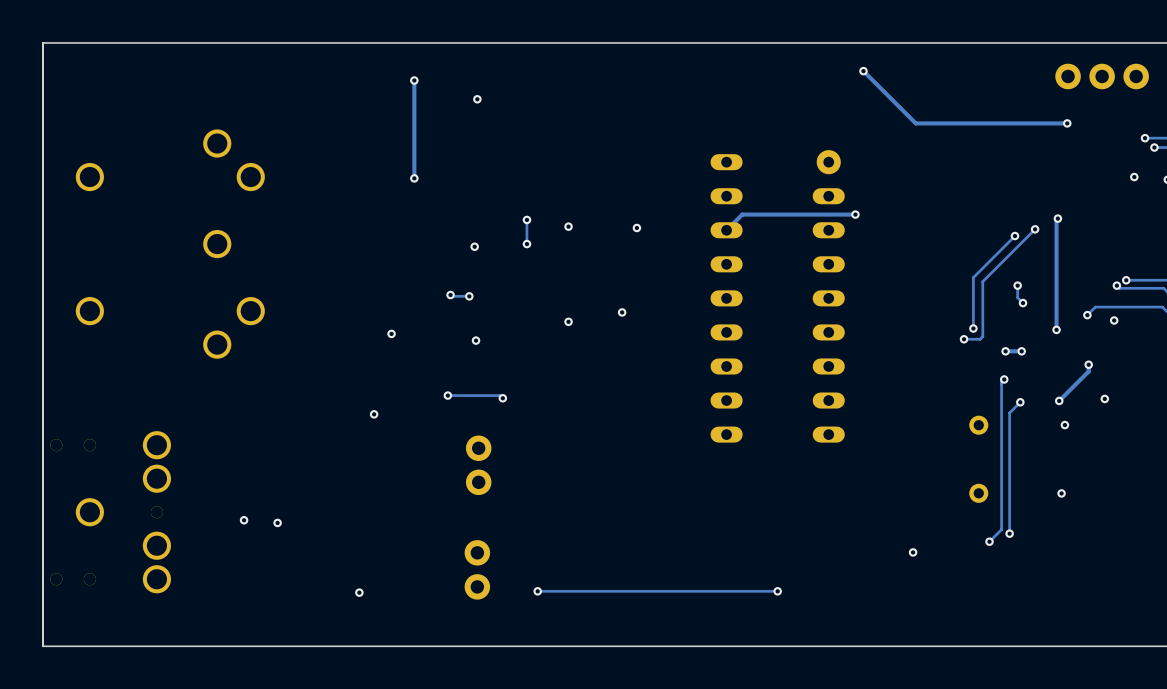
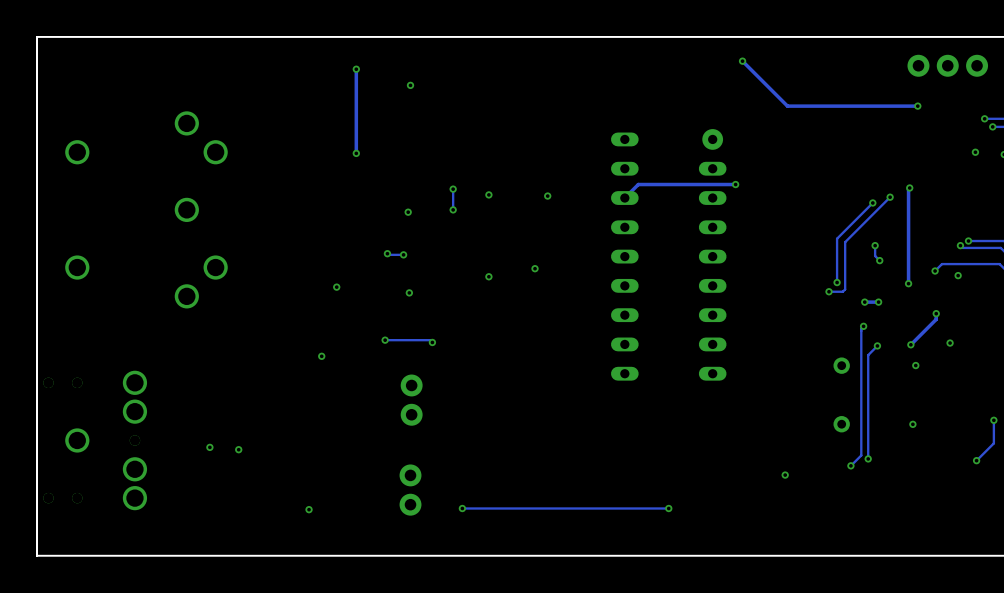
track: none -> (993, 420) (993, 443) (976, 460)
via: none -> (993, 420)
via: none -> (976, 460)

